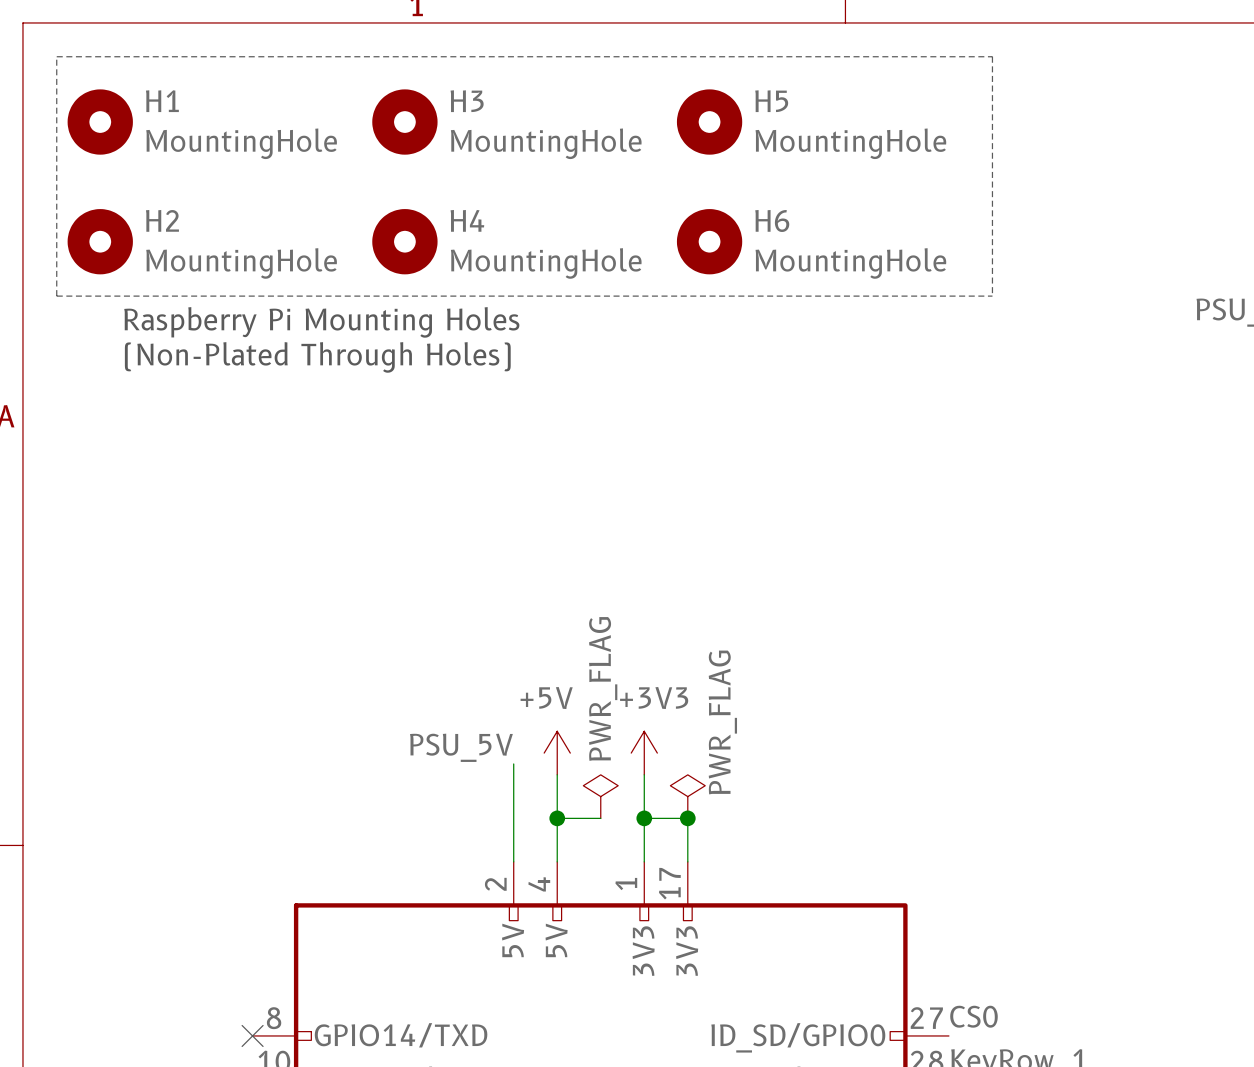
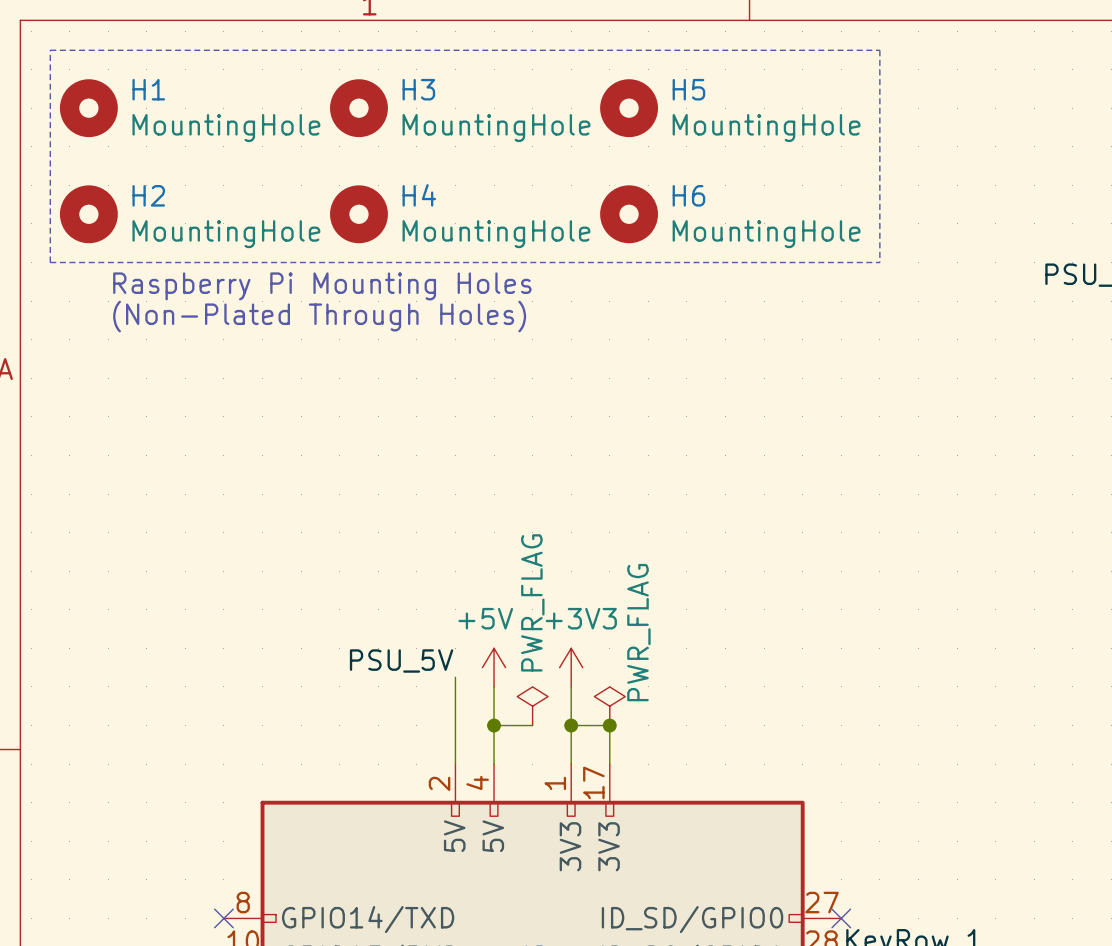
label: CS0 (973, 1016) -> none
no-connect mark: none -> (841, 918)

